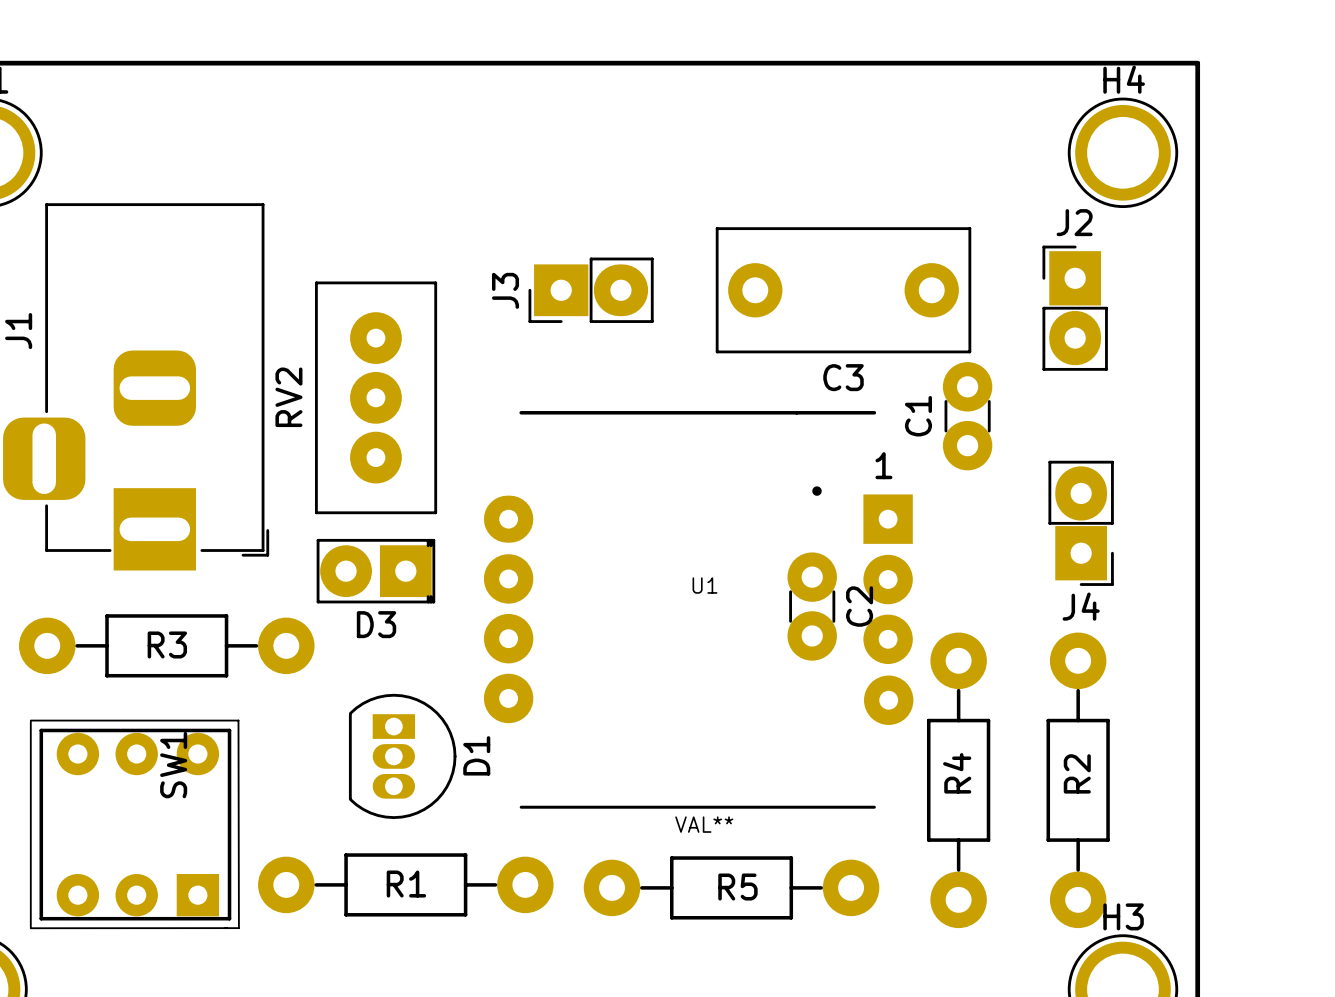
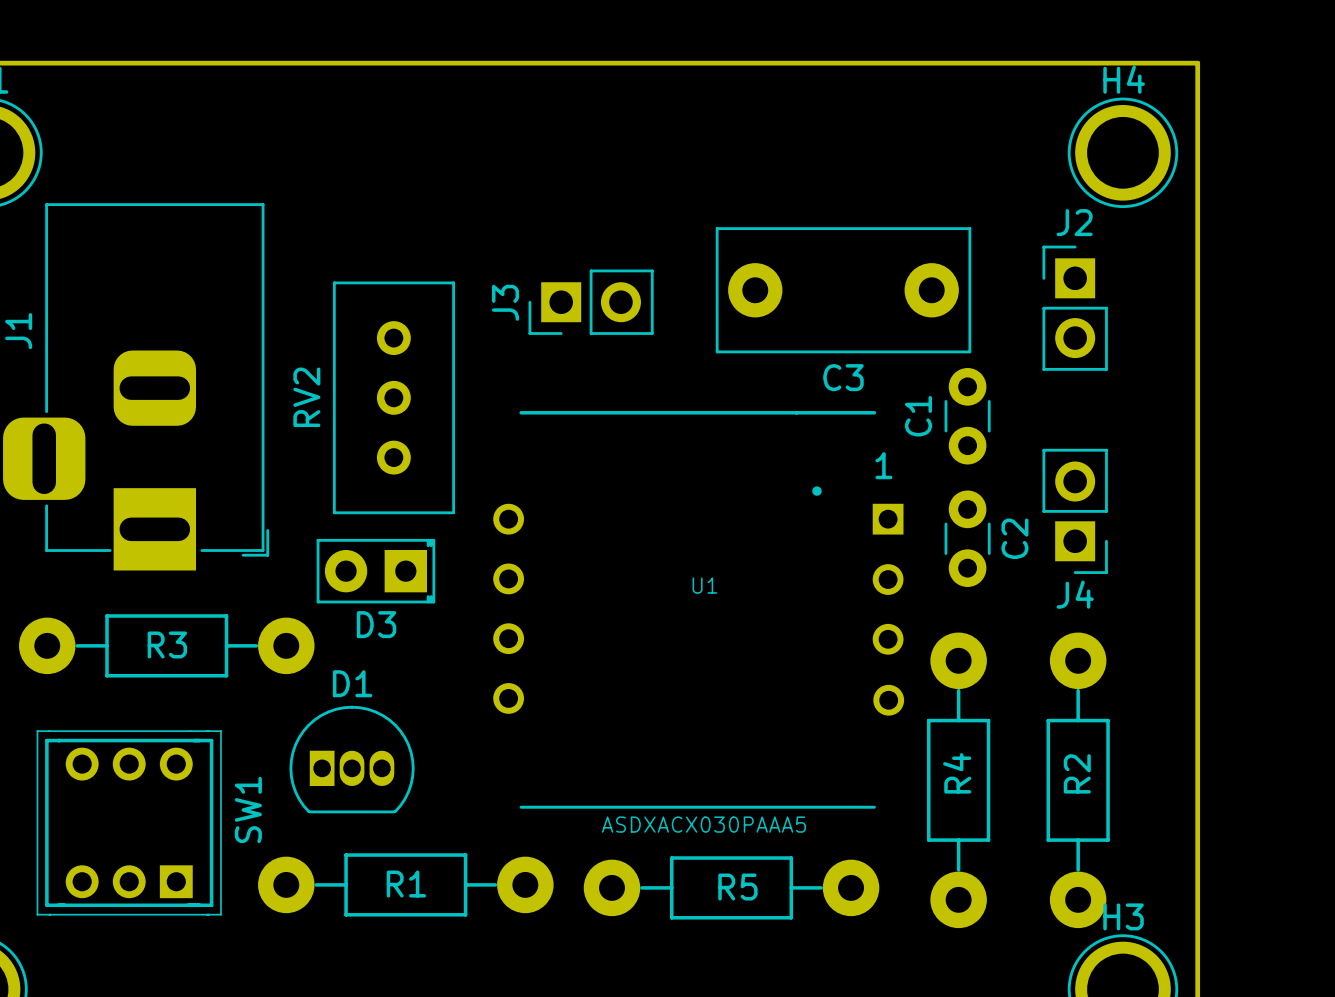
J2 footprint: [1042, 245, 1108, 371] -> [1042, 245, 1108, 371]
J3 footprint: [528, 257, 654, 323] -> [528, 269, 654, 335]
RV2 footprint: [315, 281, 438, 515] -> [332, 281, 456, 515]
C1 footprint: [942, 362, 993, 471] -> [944, 368, 991, 465]
U1 footprint: [483, 411, 914, 809] -> [493, 411, 905, 809]
J4 footprint: [1048, 460, 1114, 586] -> [1042, 448, 1108, 574]
D3 footprint: [316, 538, 436, 604] -> [316, 538, 436, 604]
C2 footprint: [787, 552, 837, 661] -> [944, 490, 991, 587]
D1 footprint: [348, 693, 457, 820] -> [289, 705, 415, 814]
SW1 footprint: [30, 719, 240, 929] -> [36, 730, 222, 916]
D1 name position: D1 (476, 755) -> D1 (352, 683)
SW1 name position: SW1 (173, 765) -> SW1 (248, 809)
U1 value: VAL** (704, 824) -> ASDXACX030PAAA5 (703, 824)

